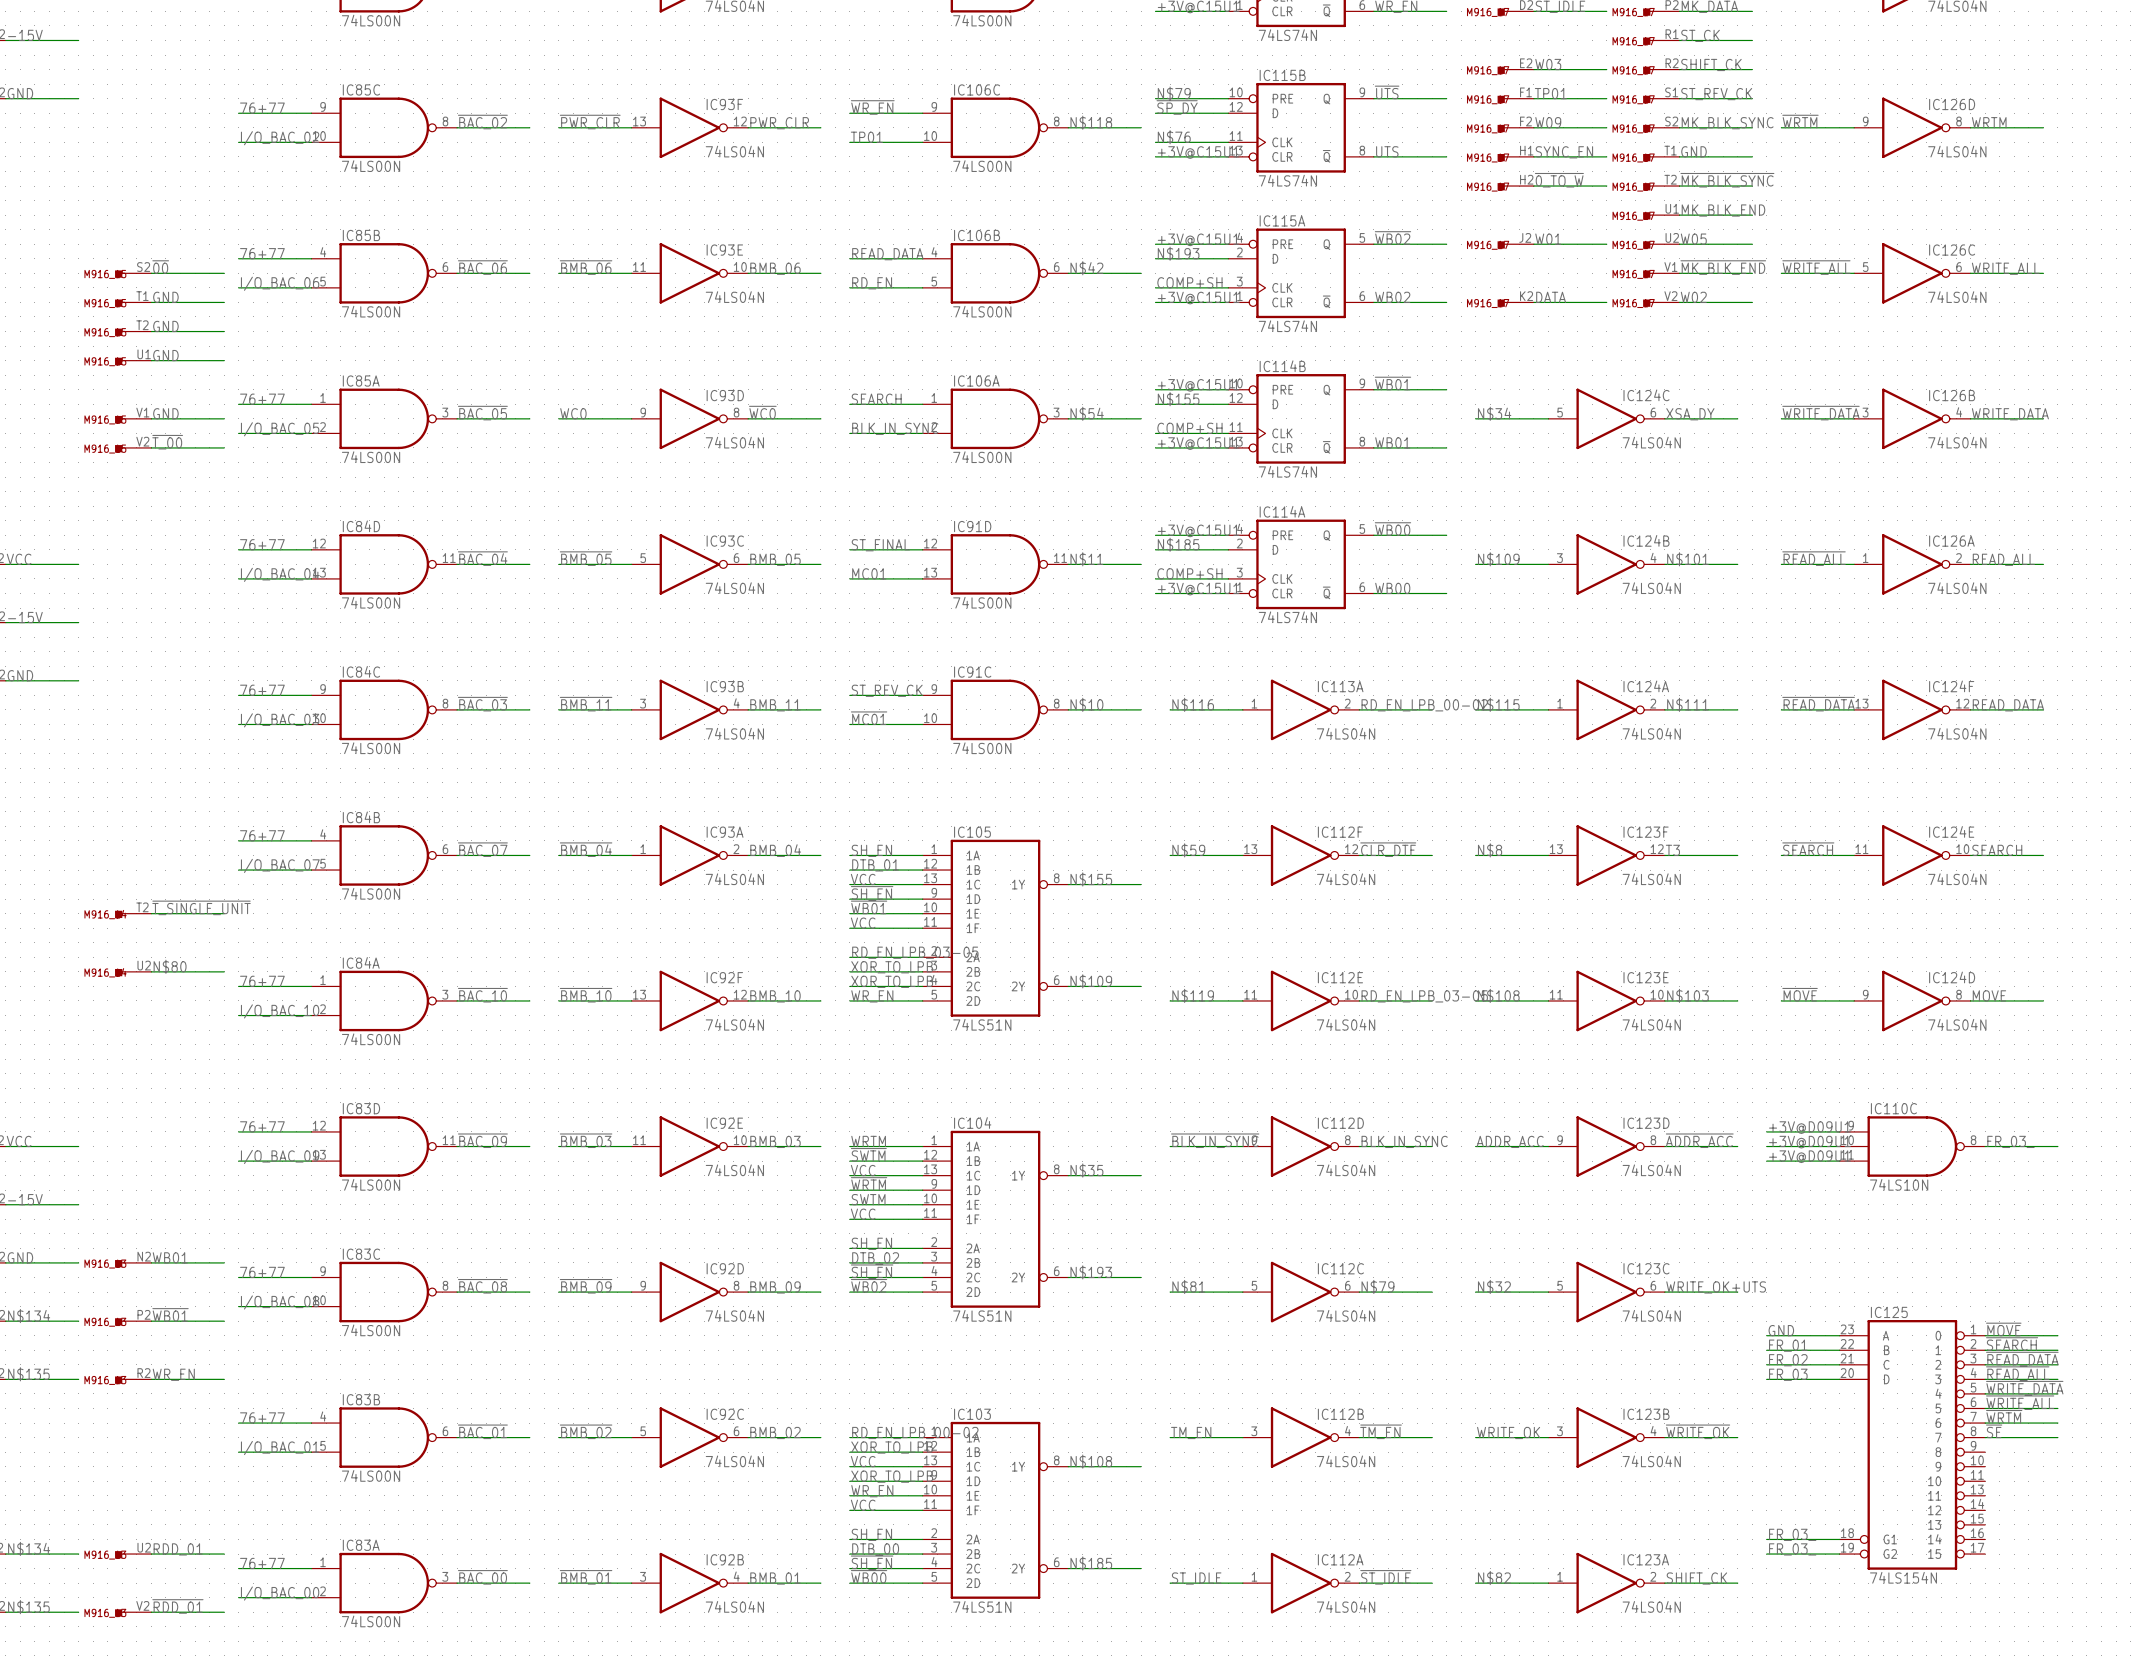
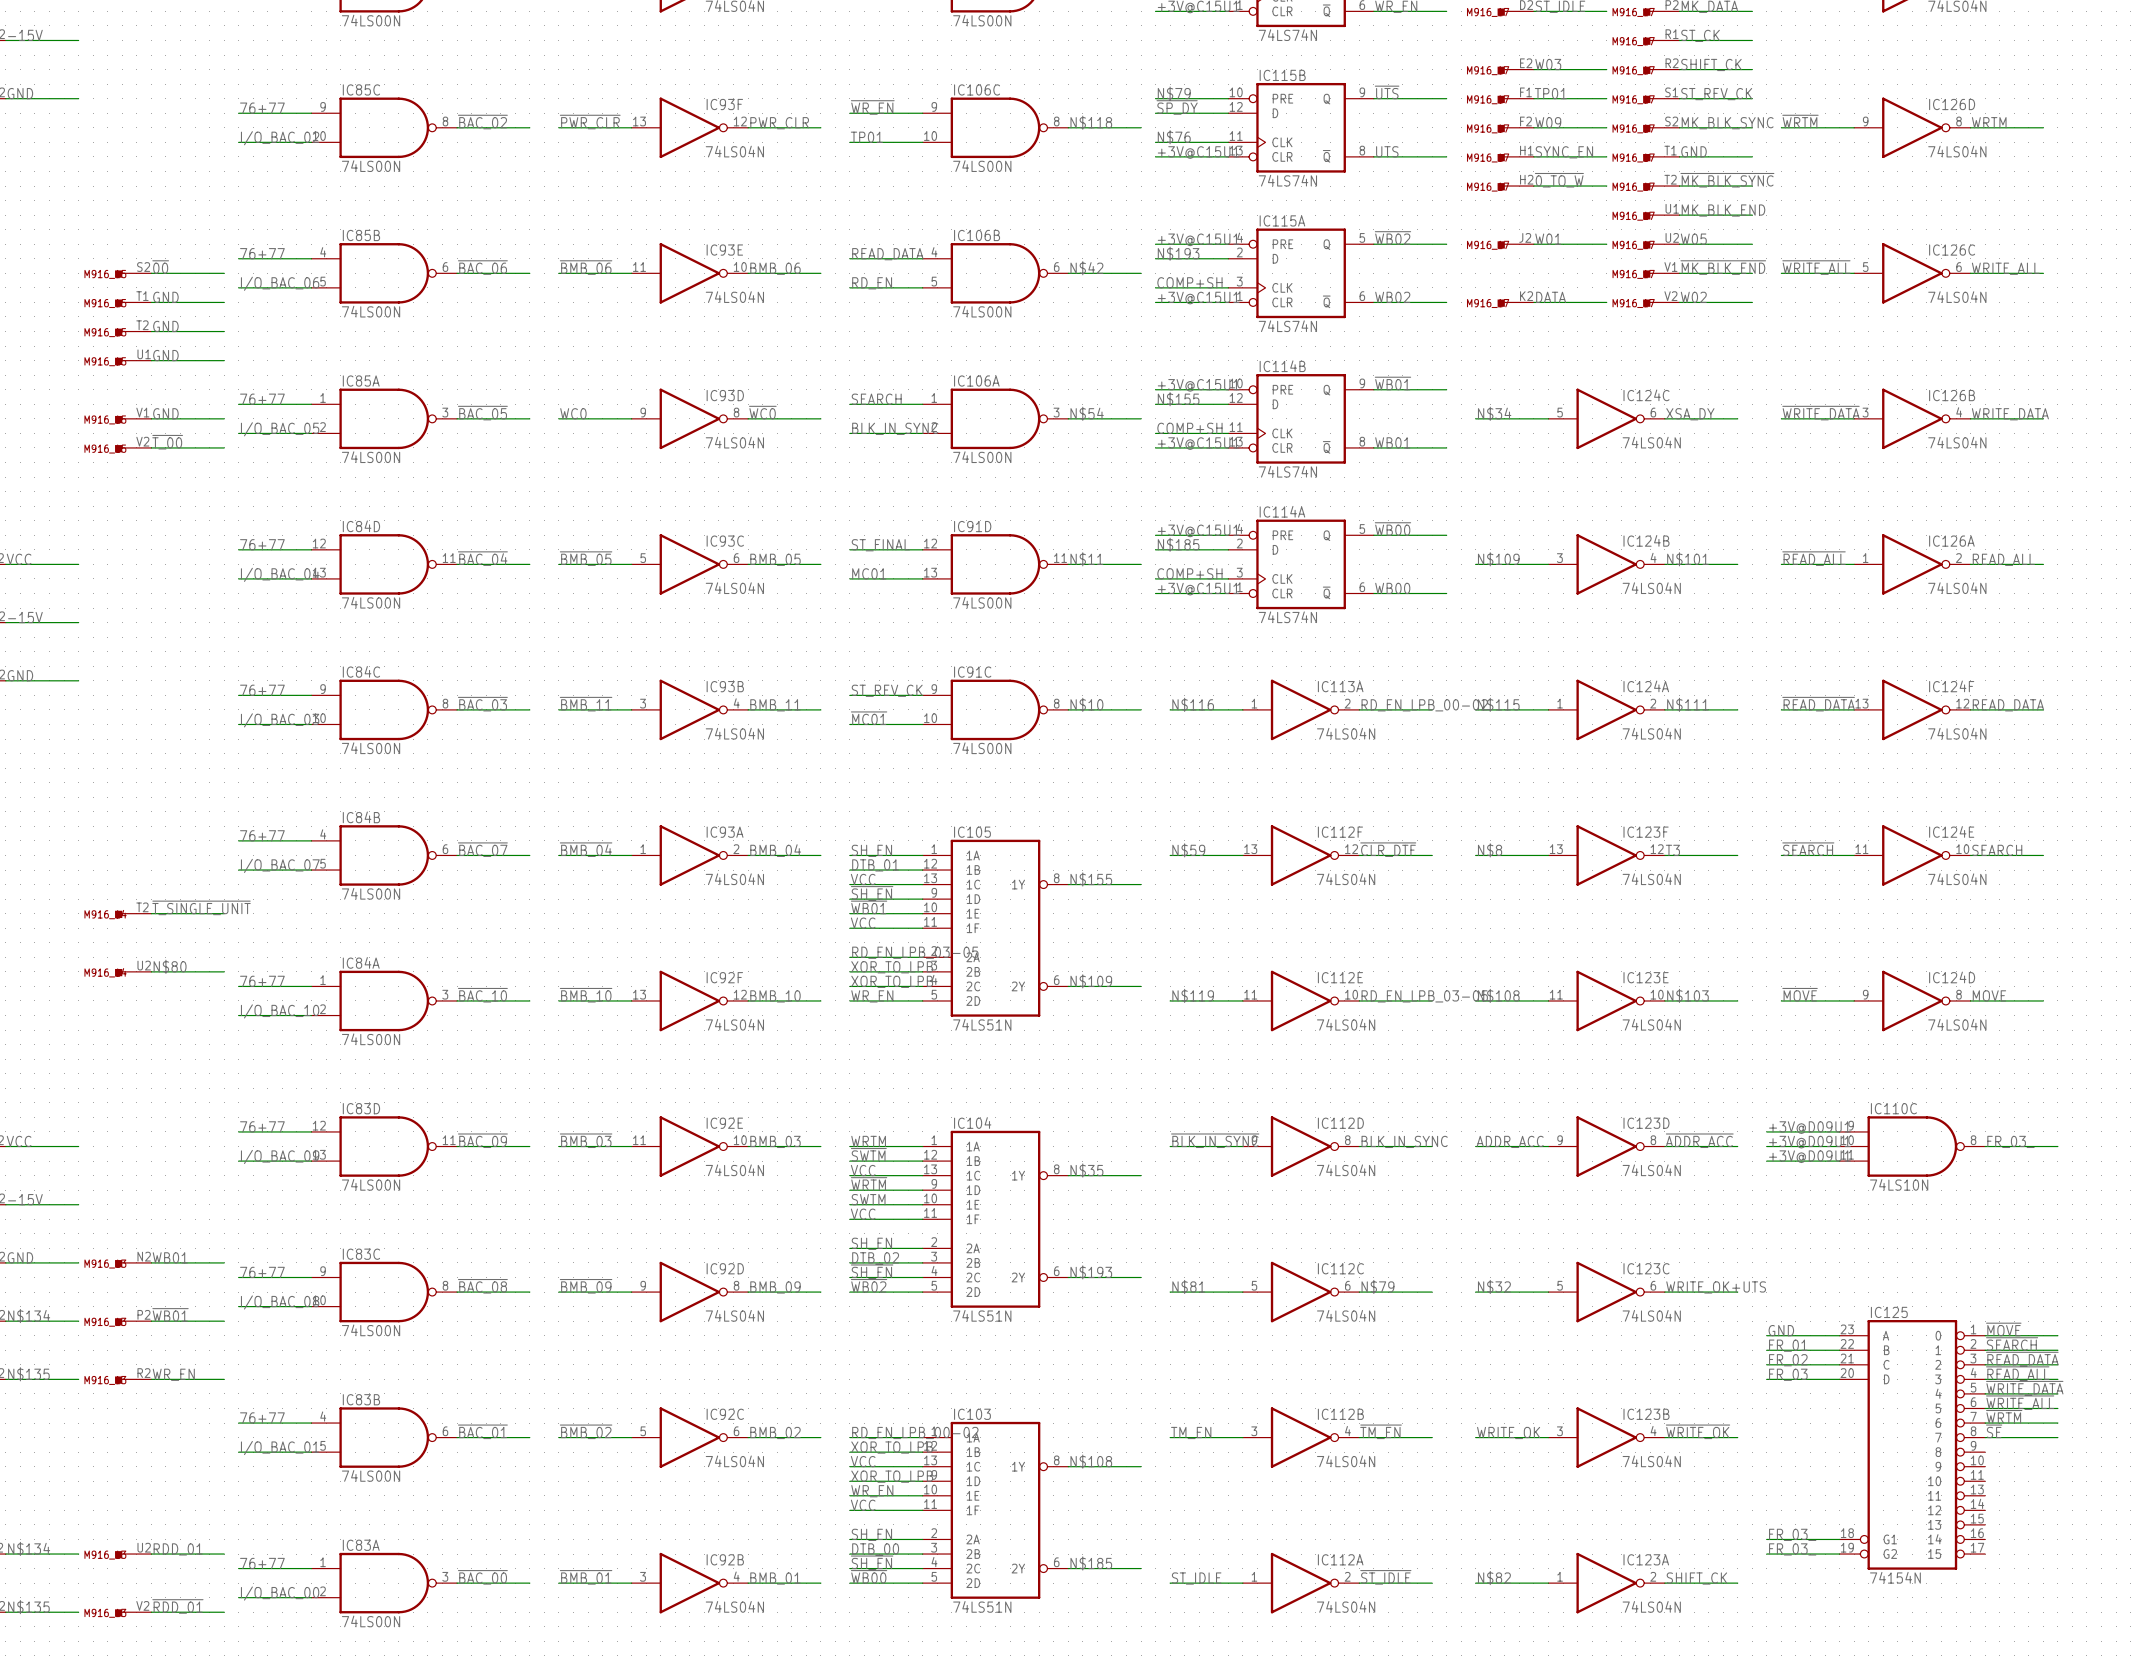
IC125 value: 74LS154N (1903, 1577) -> 74154N (1895, 1577)

